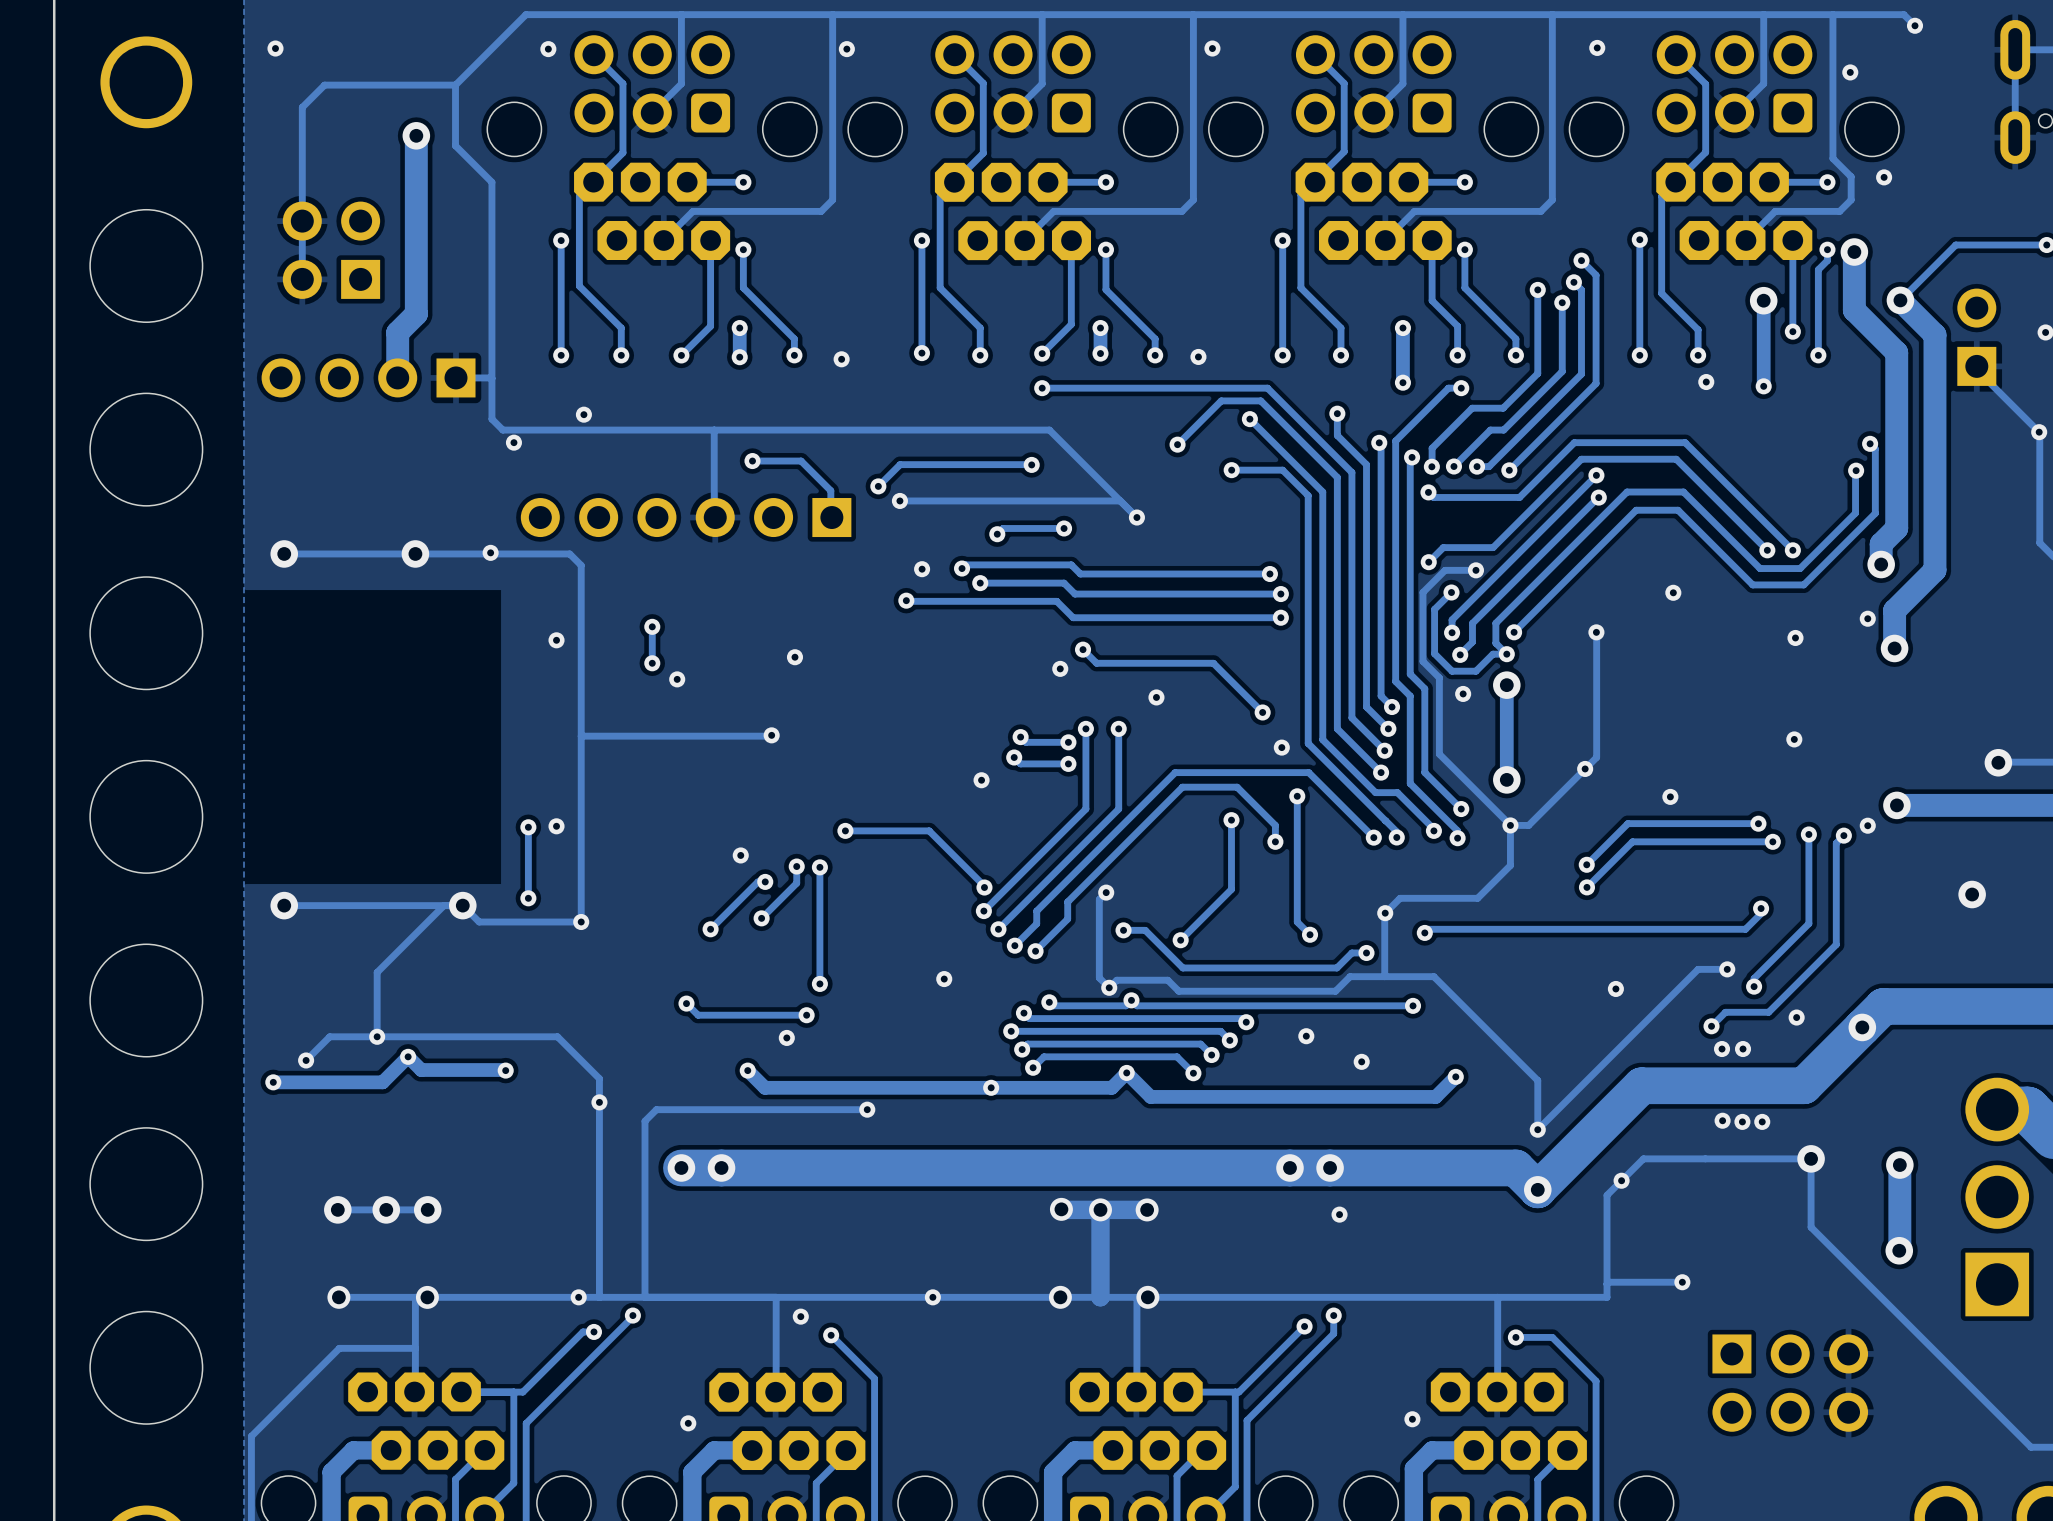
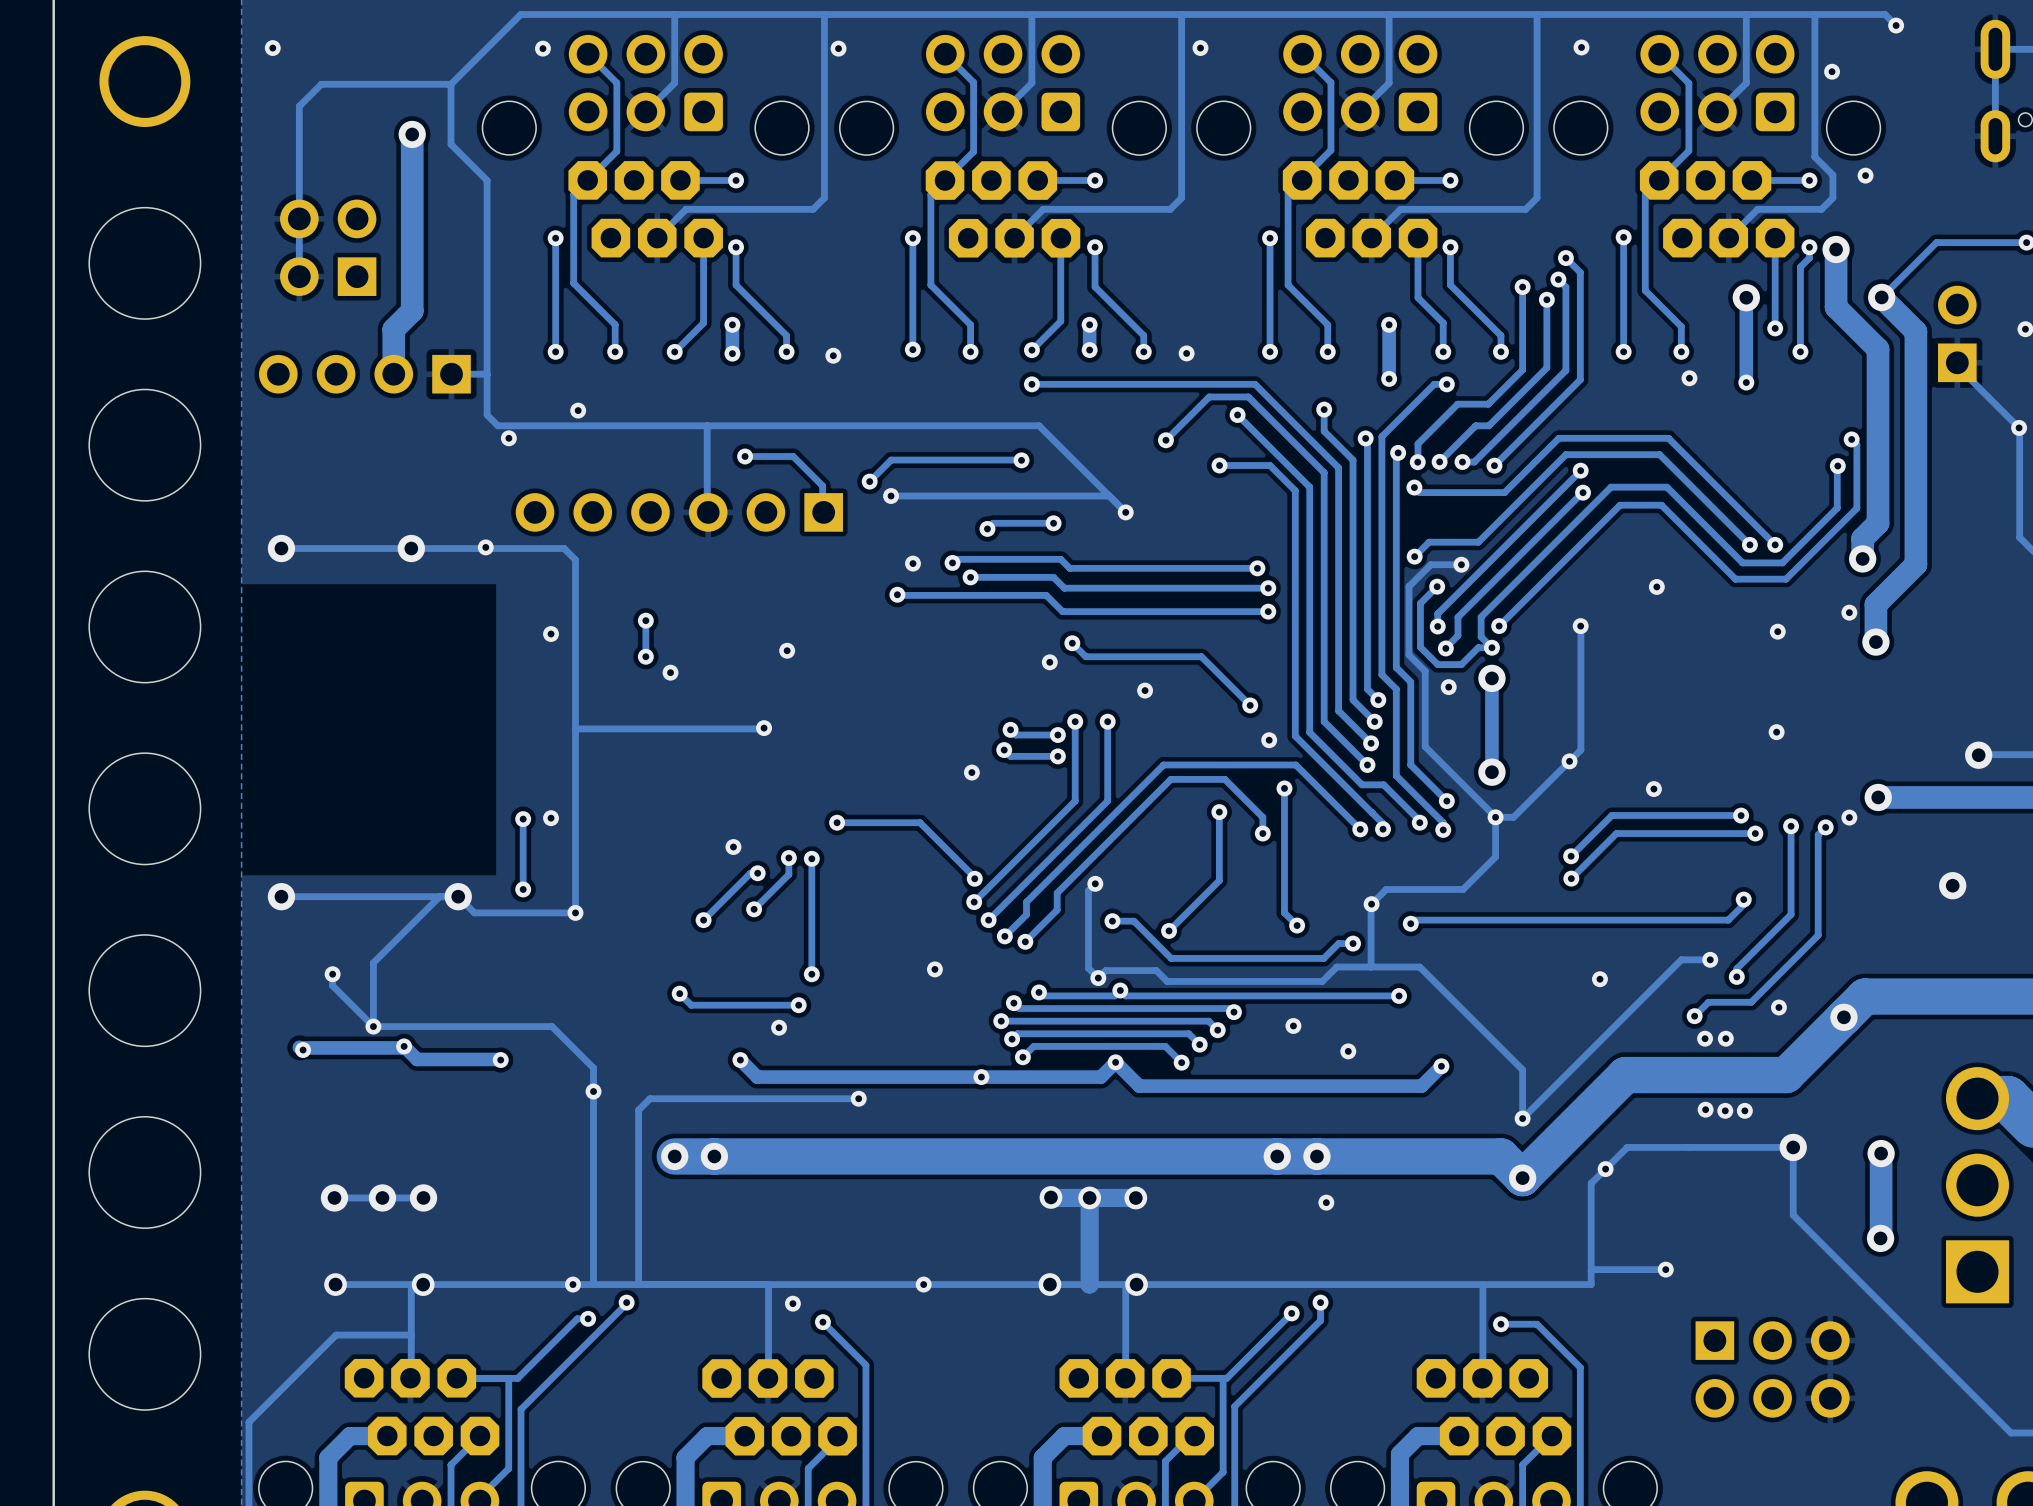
track: (377, 1036) (329, 1036) (306, 1060) -> (373, 1026) (332, 985) (332, 974)
track: (406, 1058) (382, 1082) (273, 1082) -> (402, 1047) (299, 1047)
via position: (273, 1082) -> (332, 974)
via: (1412, 1419) -> none
via: (688, 1423) -> none

